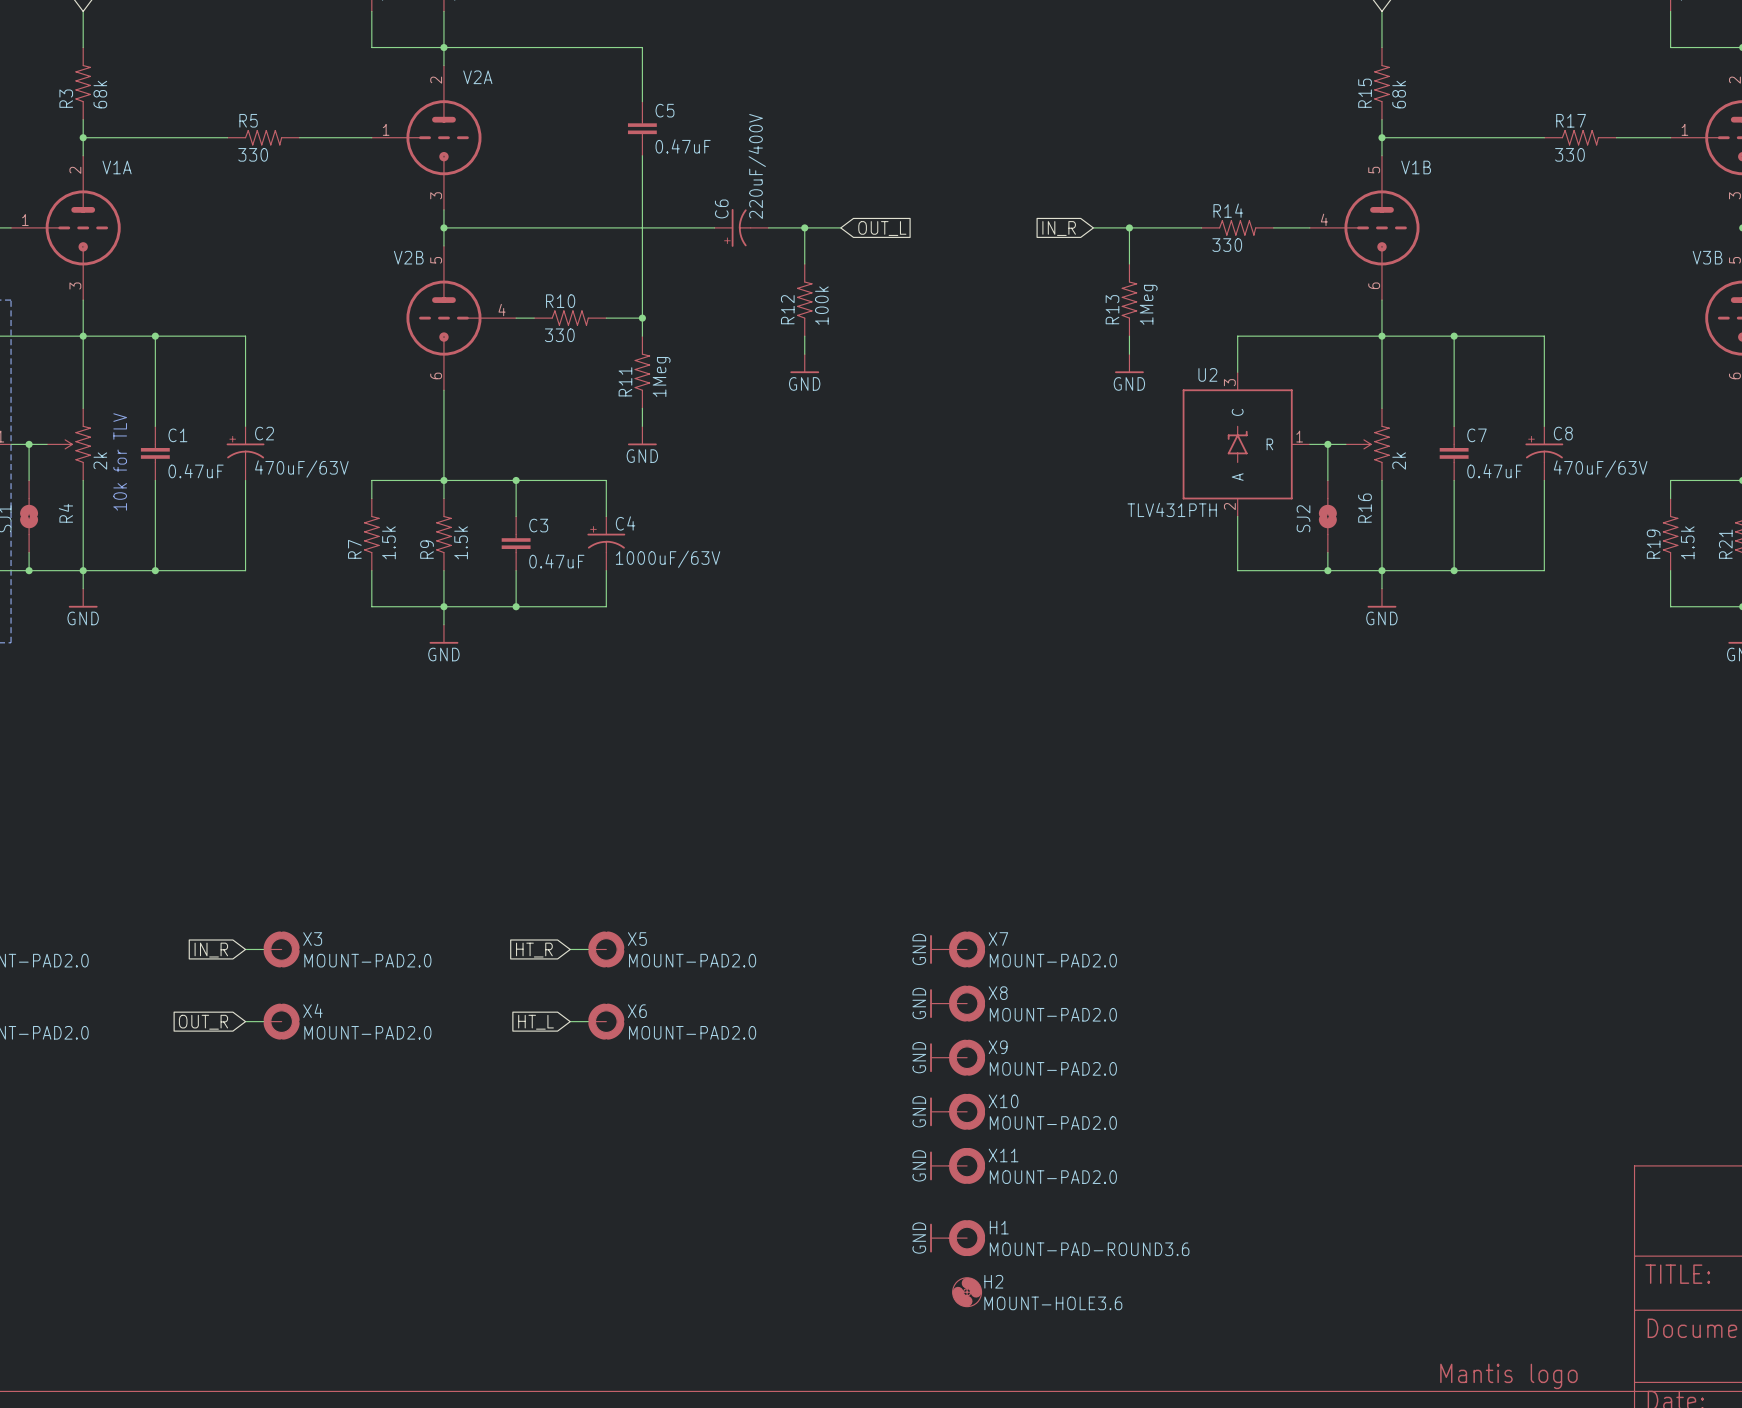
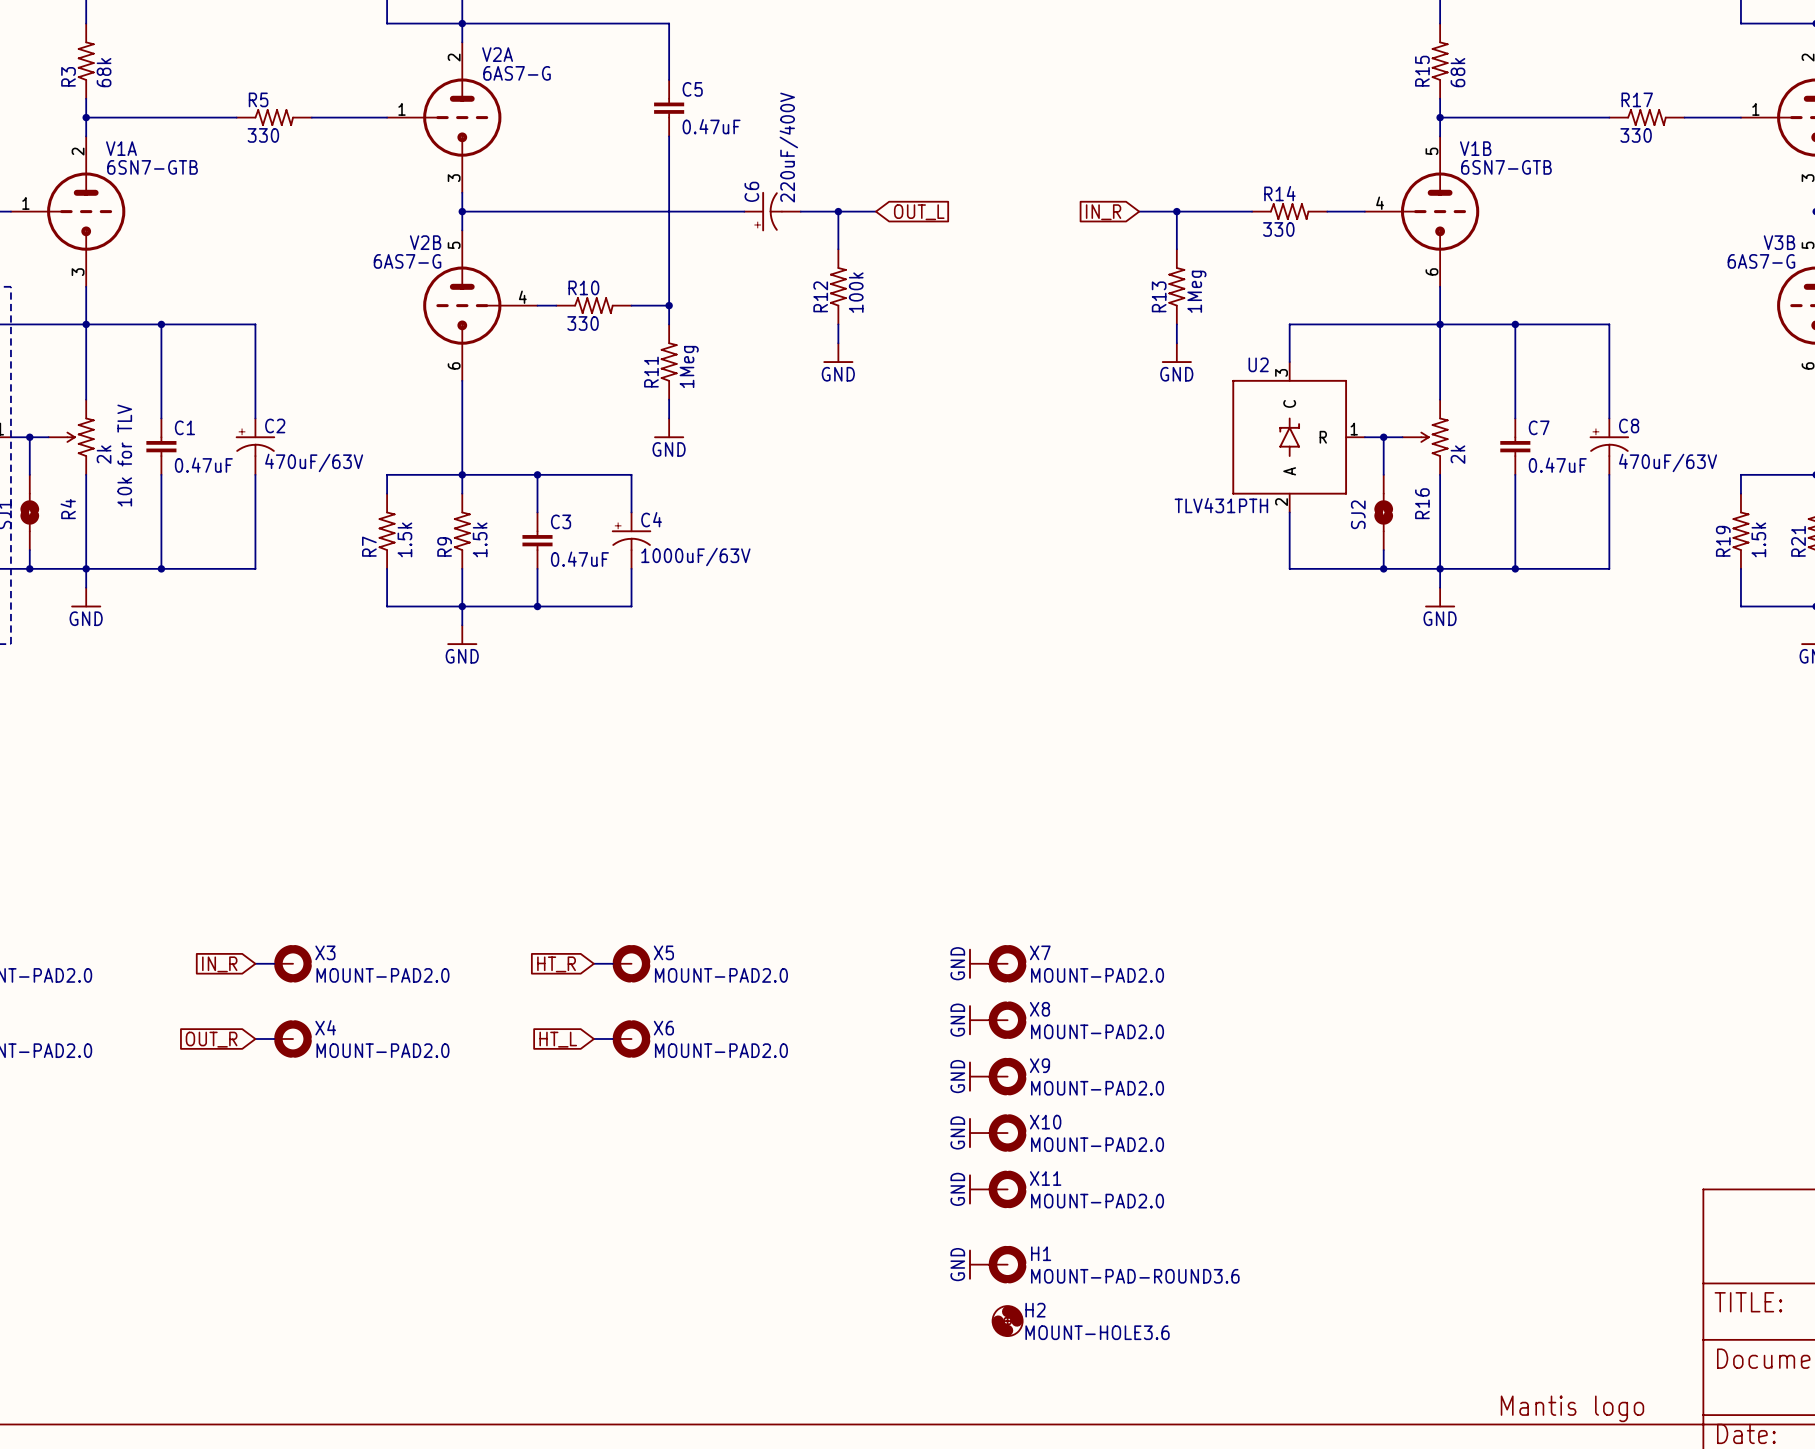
V2A value: none -> 6AS7-G (517, 73)
V1A value: none -> 6SN7-GTB (152, 167)
V1B value: none -> 6SN7-GTB (1506, 167)
V2B value: none -> 6AS7-G (407, 261)
V3B value: none -> 6AS7-G (1761, 261)

